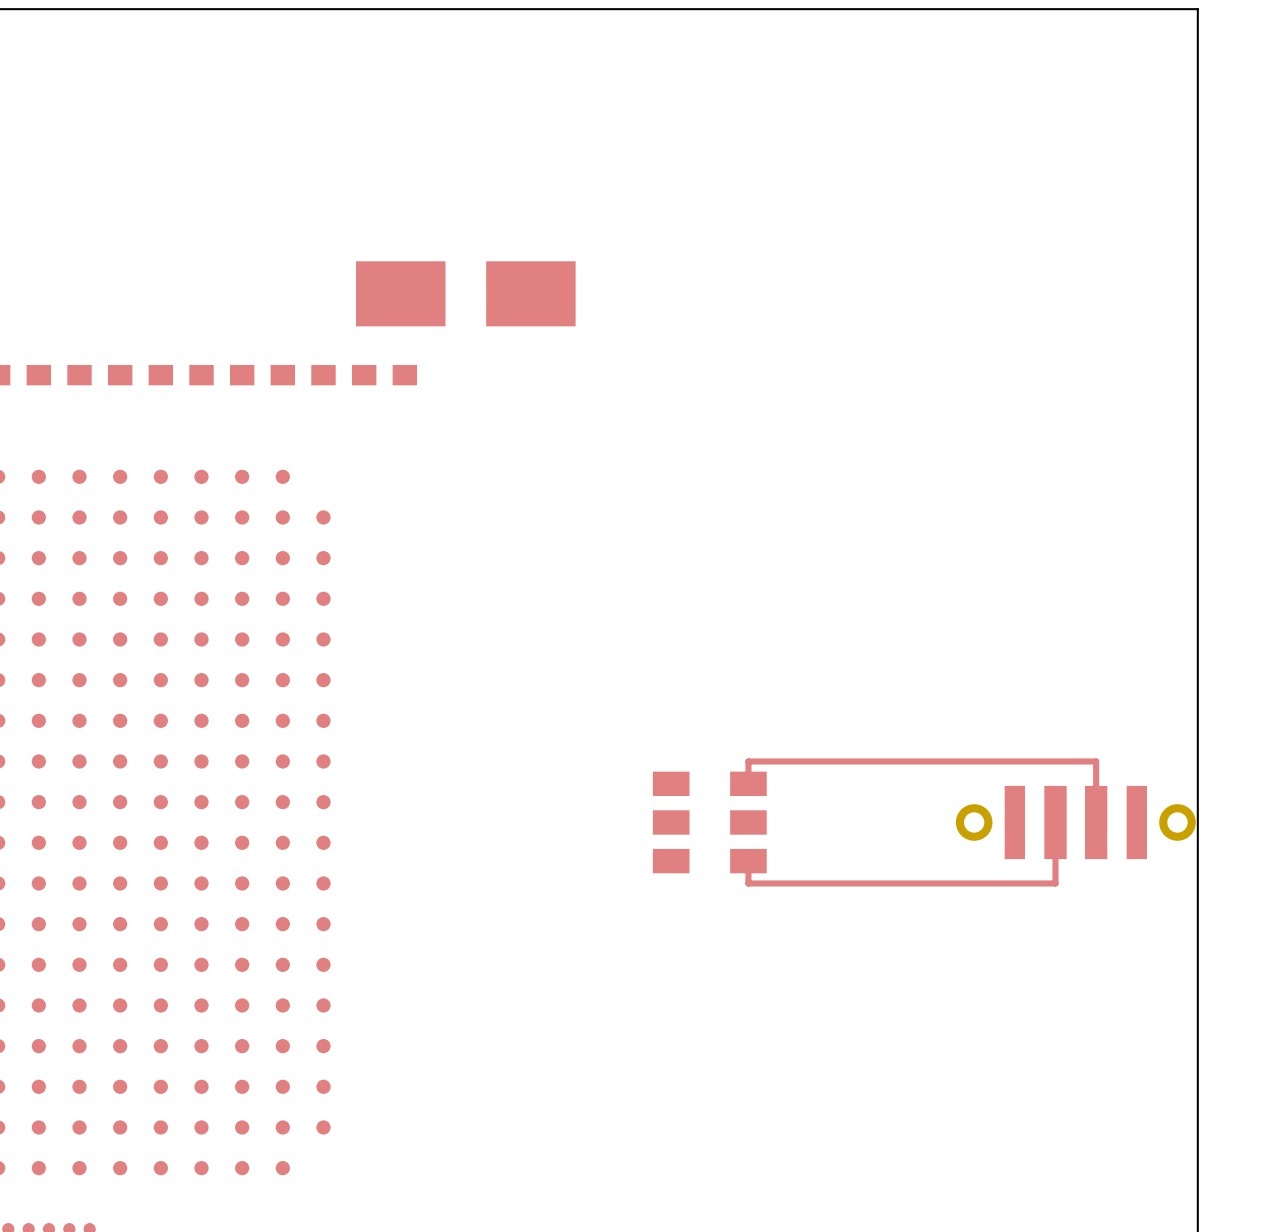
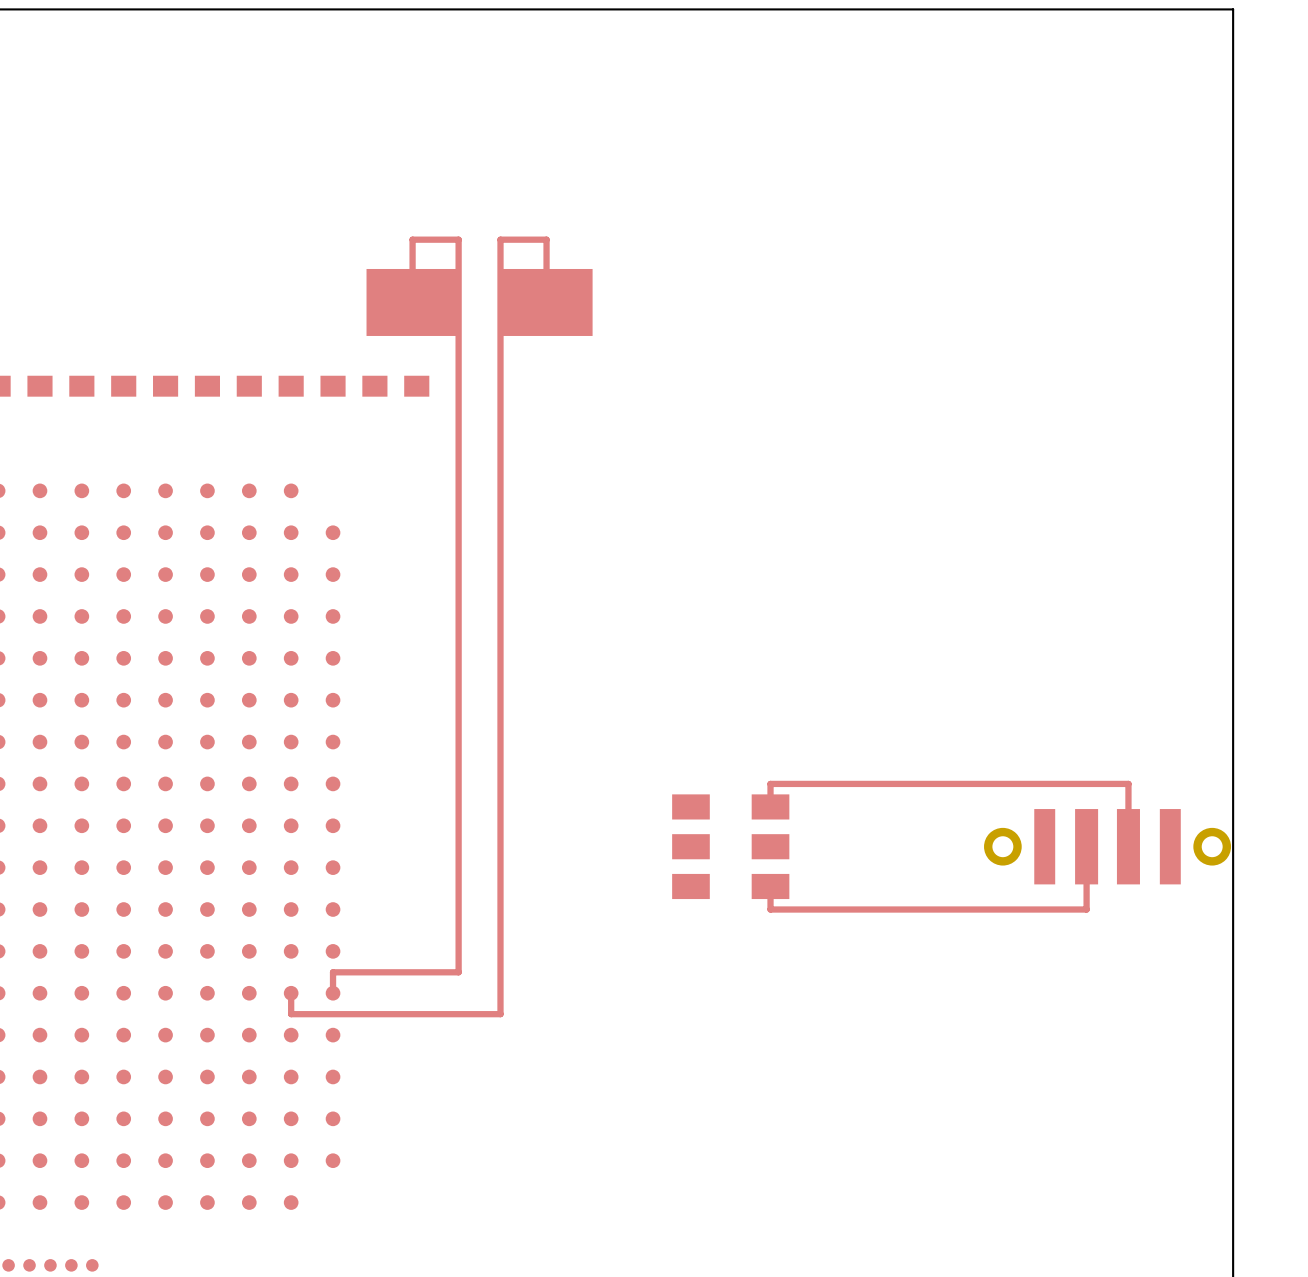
top track: none -> (412, 302) (412, 239) (458, 239) (458, 972) (333, 972) (333, 993)
top track: none -> (546, 302) (546, 239) (500, 239) (500, 1014) (291, 1014) (291, 993)

